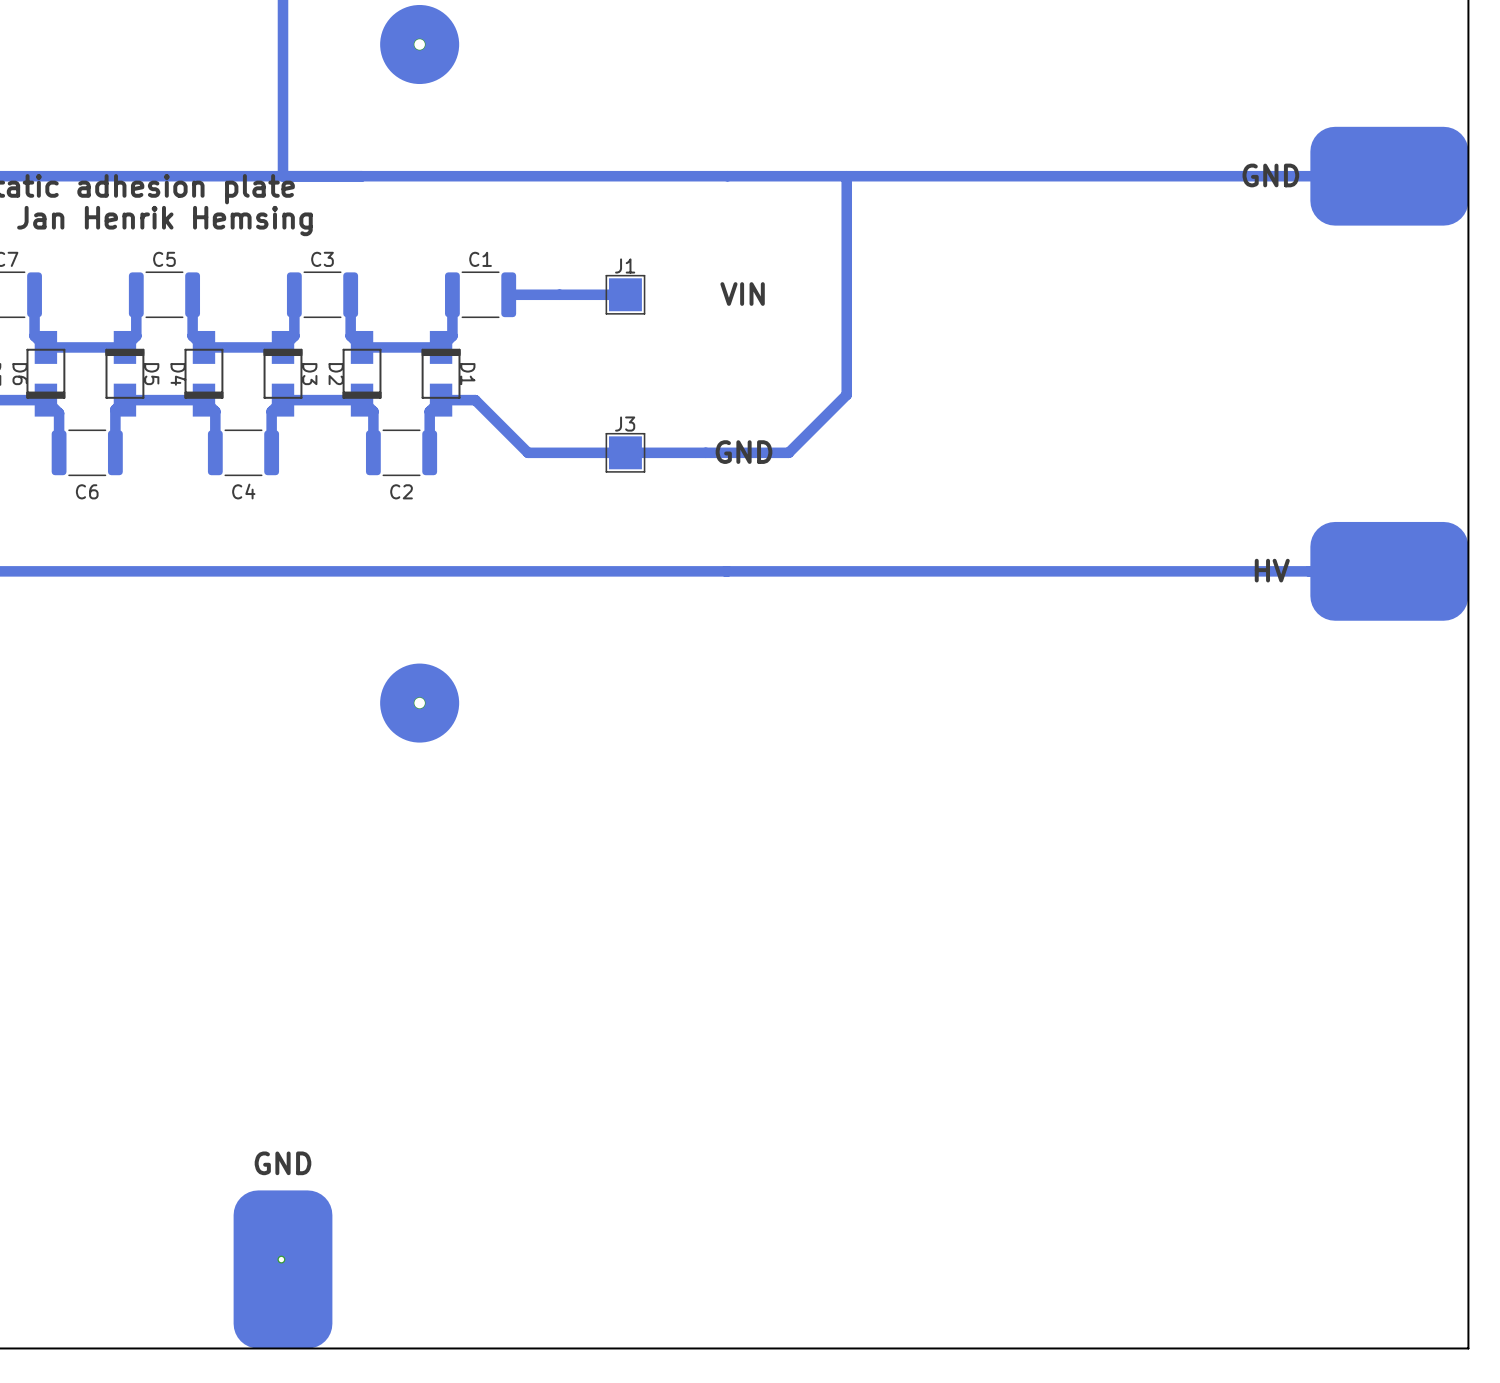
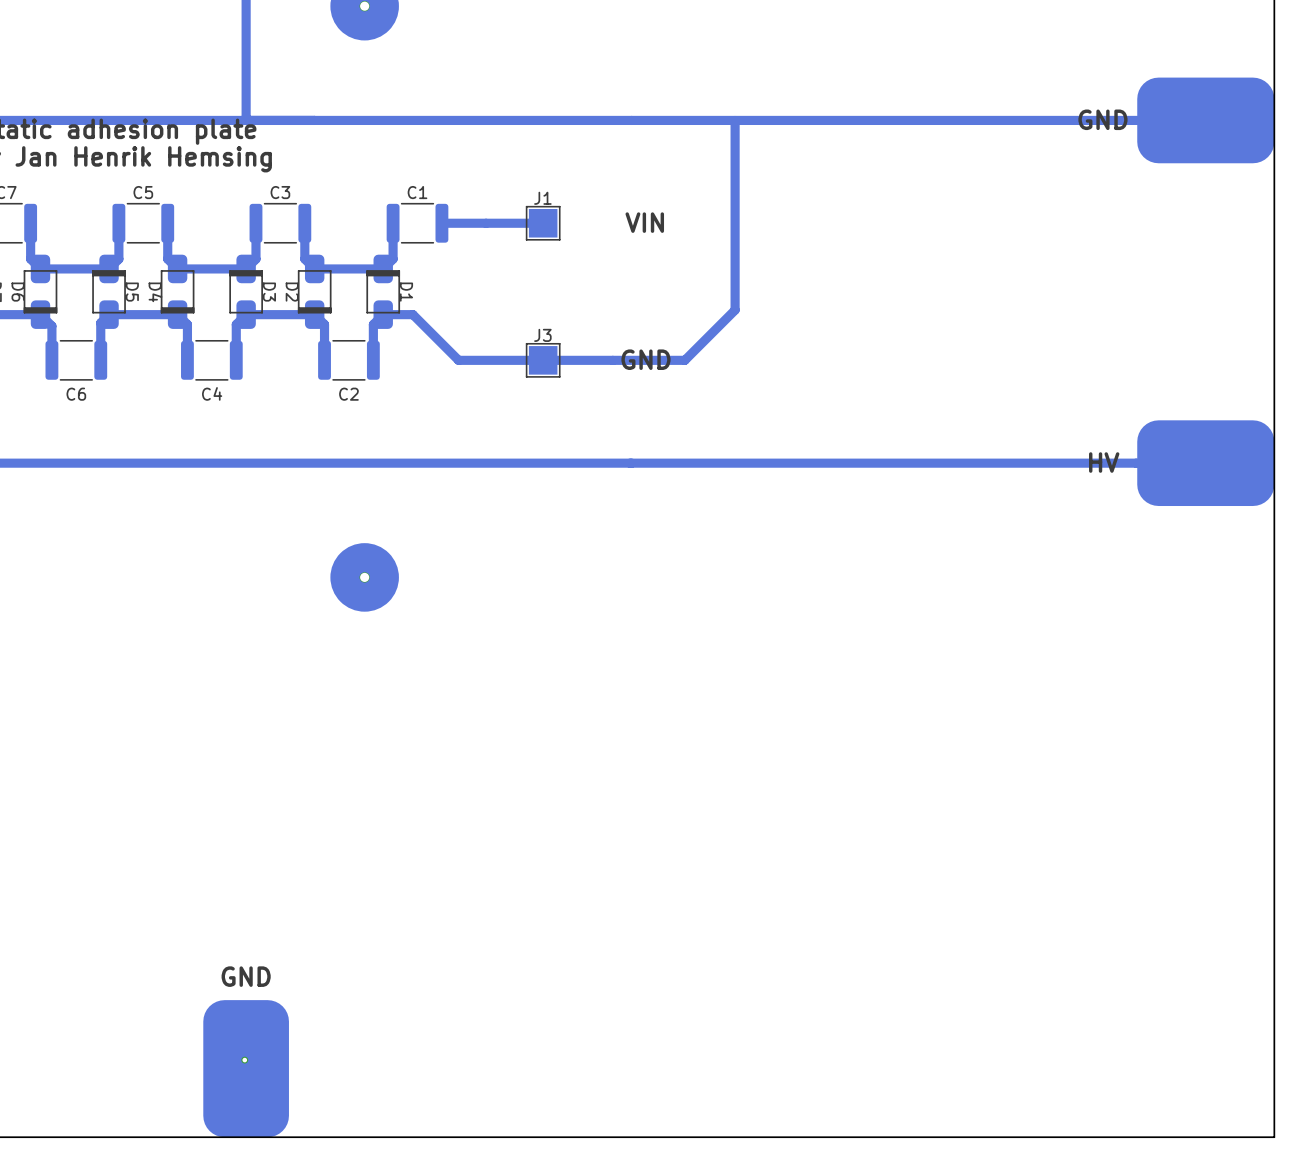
D6 footprint: [26, 330, 66, 417] -> [23, 254, 58, 329]
D5 footprint: [105, 330, 145, 417] -> [92, 254, 126, 329]
D4 footprint: [184, 330, 224, 417] -> [160, 254, 195, 329]
D3 footprint: [263, 330, 303, 417] -> [229, 254, 263, 329]
D2 footprint: [342, 330, 382, 417] -> [297, 254, 332, 329]
D1 footprint: [421, 330, 461, 417] -> [366, 254, 401, 329]

